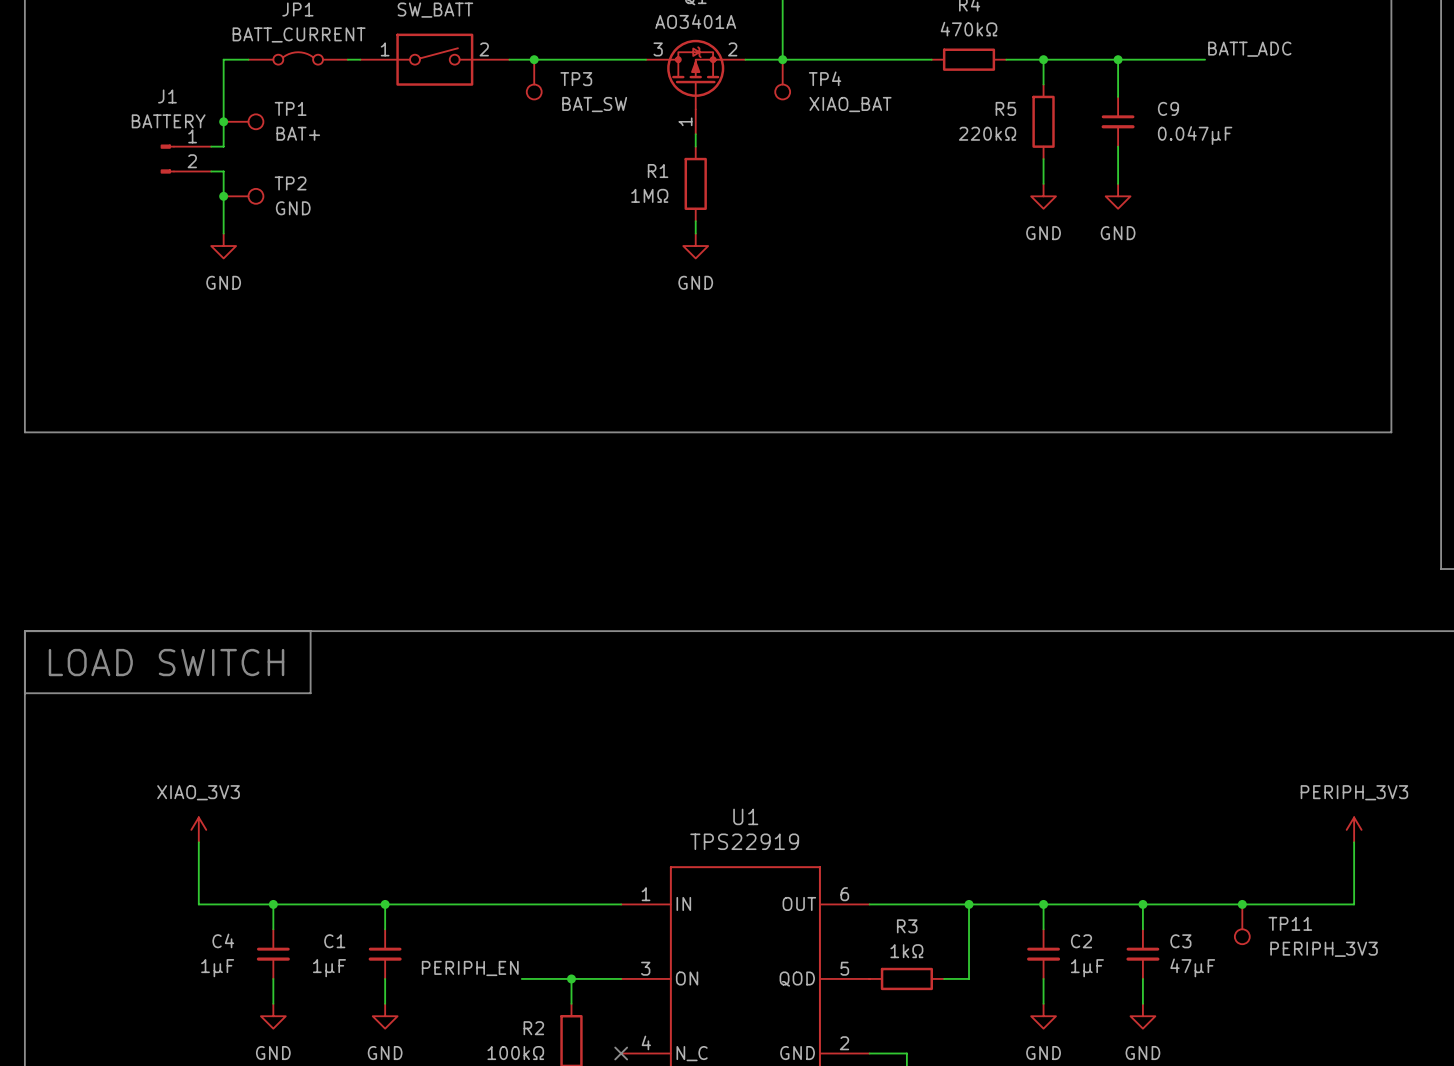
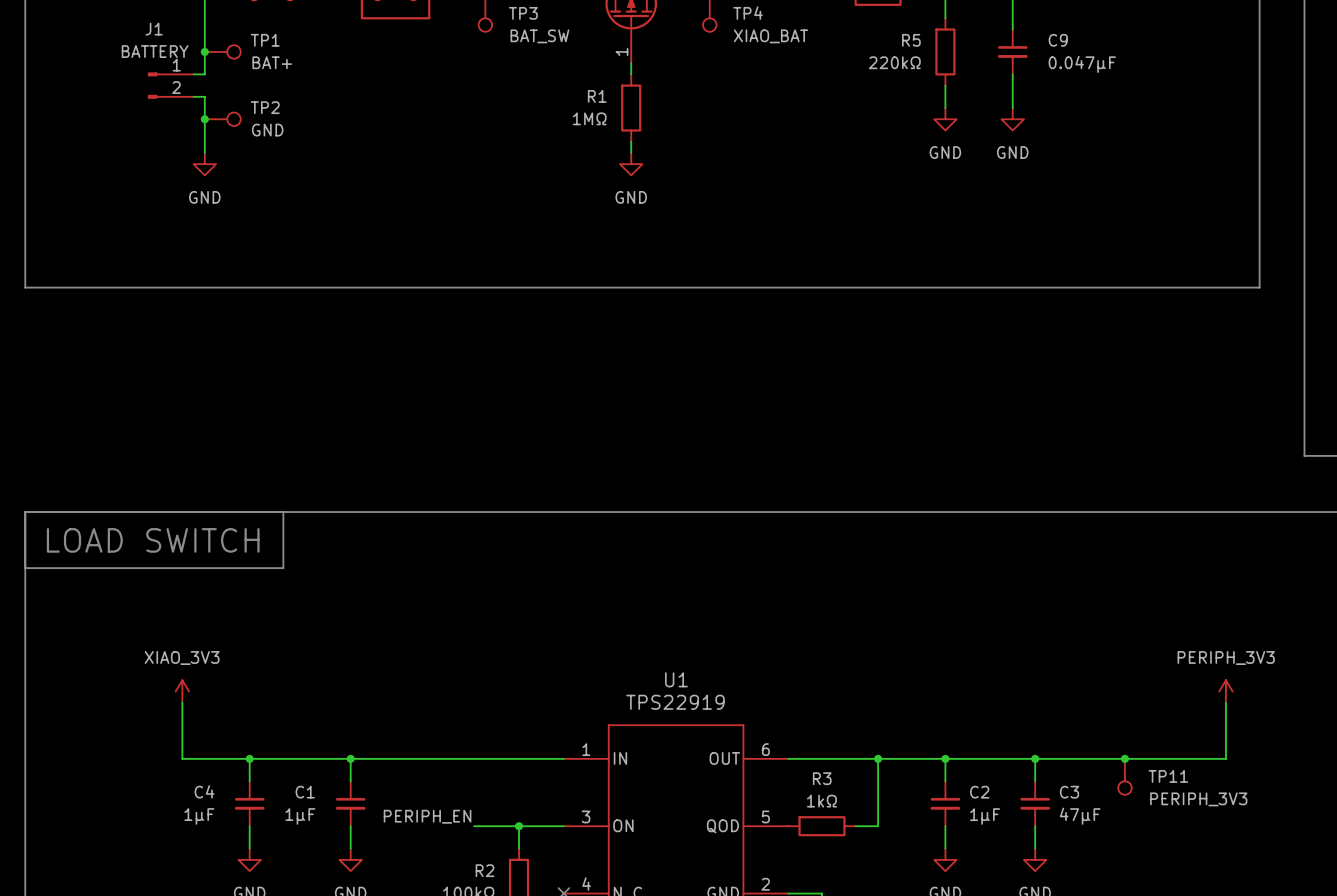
line: (24, 382) (24, 432) (1391, 432) (1391, 382) -> (25, 287) (1259, 287)

